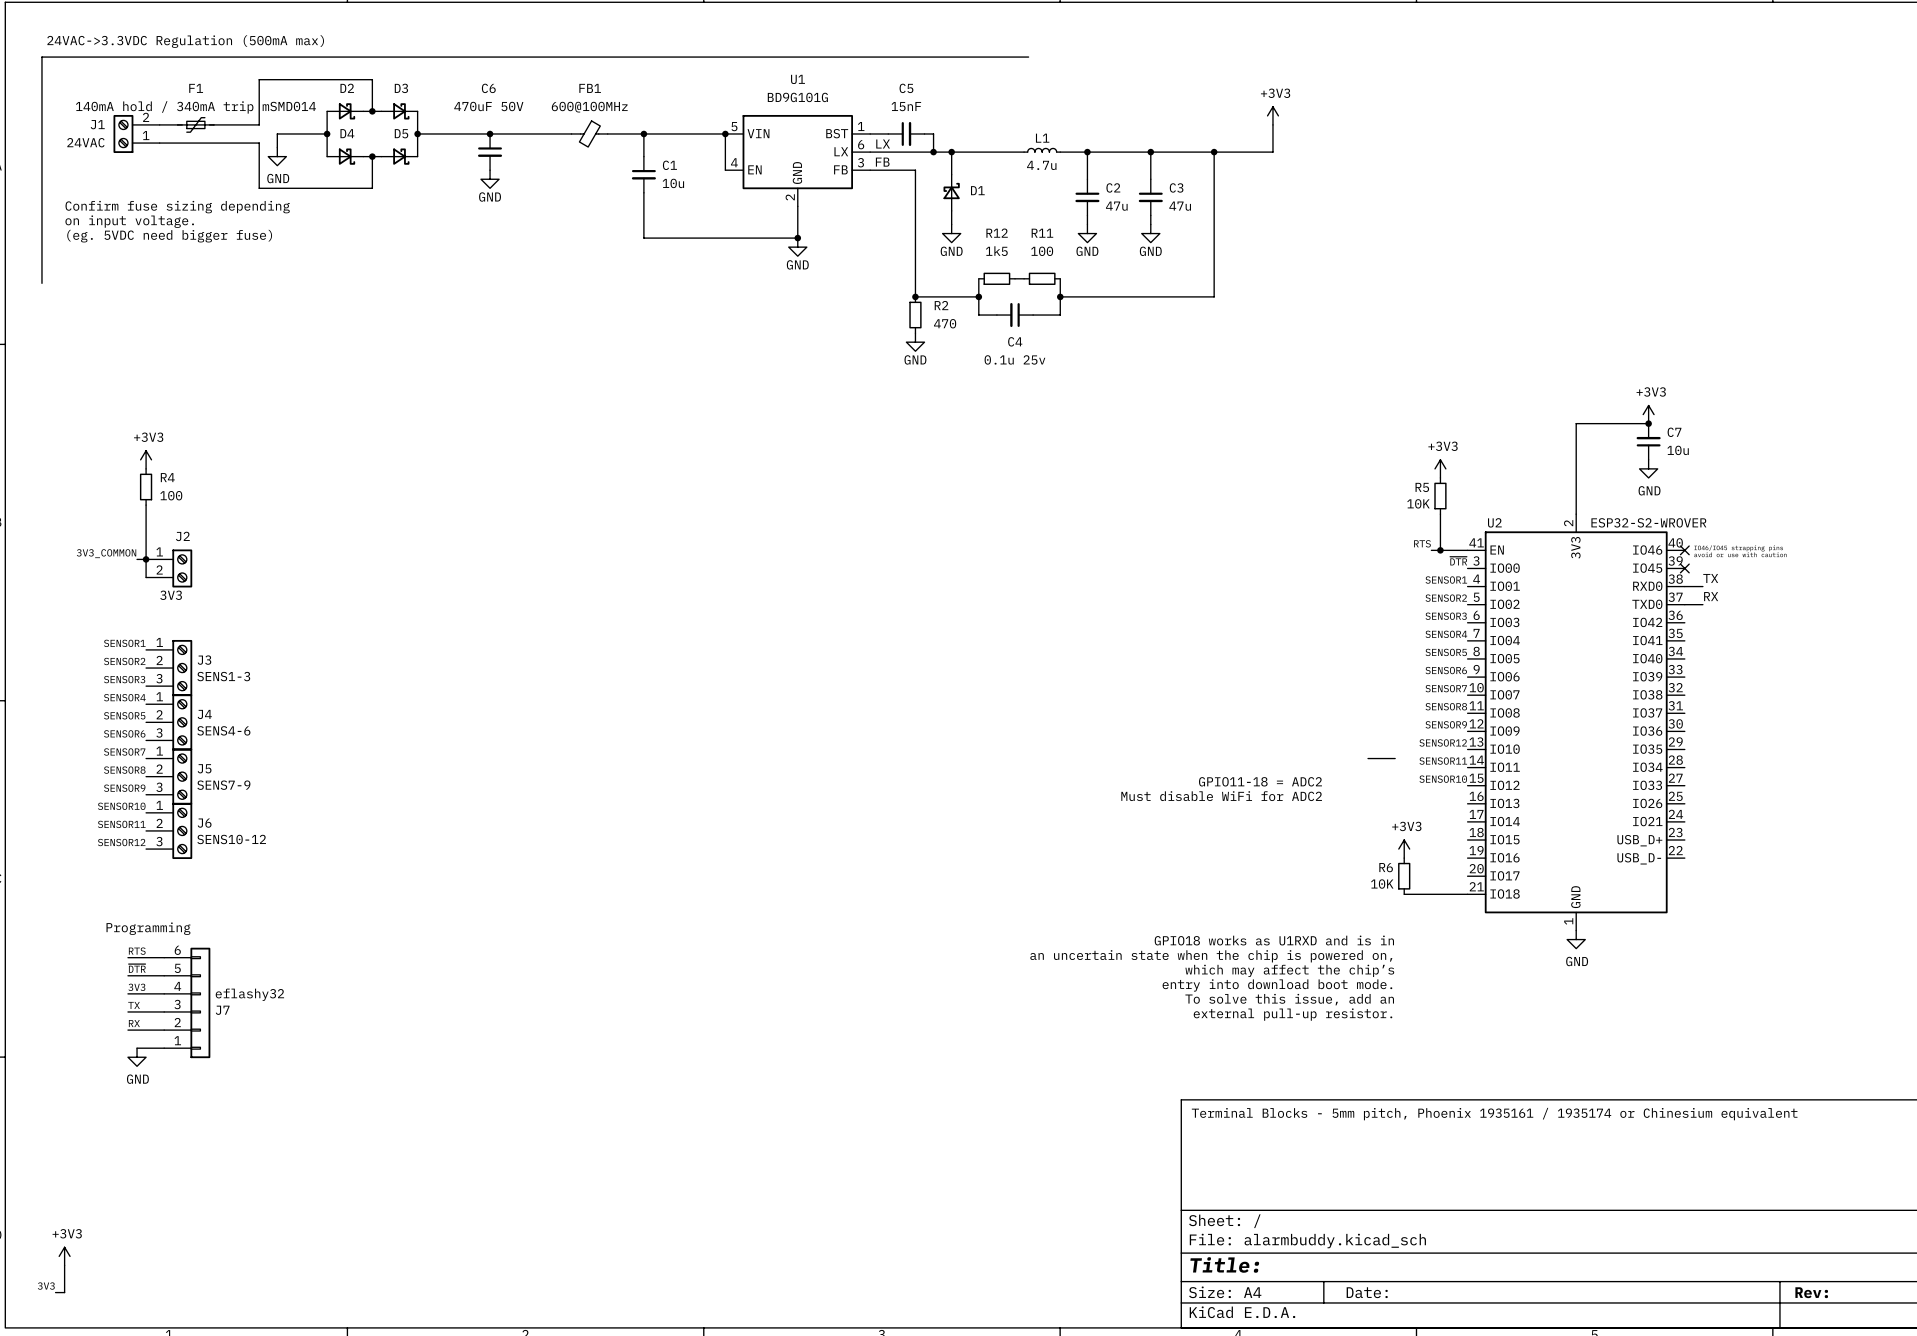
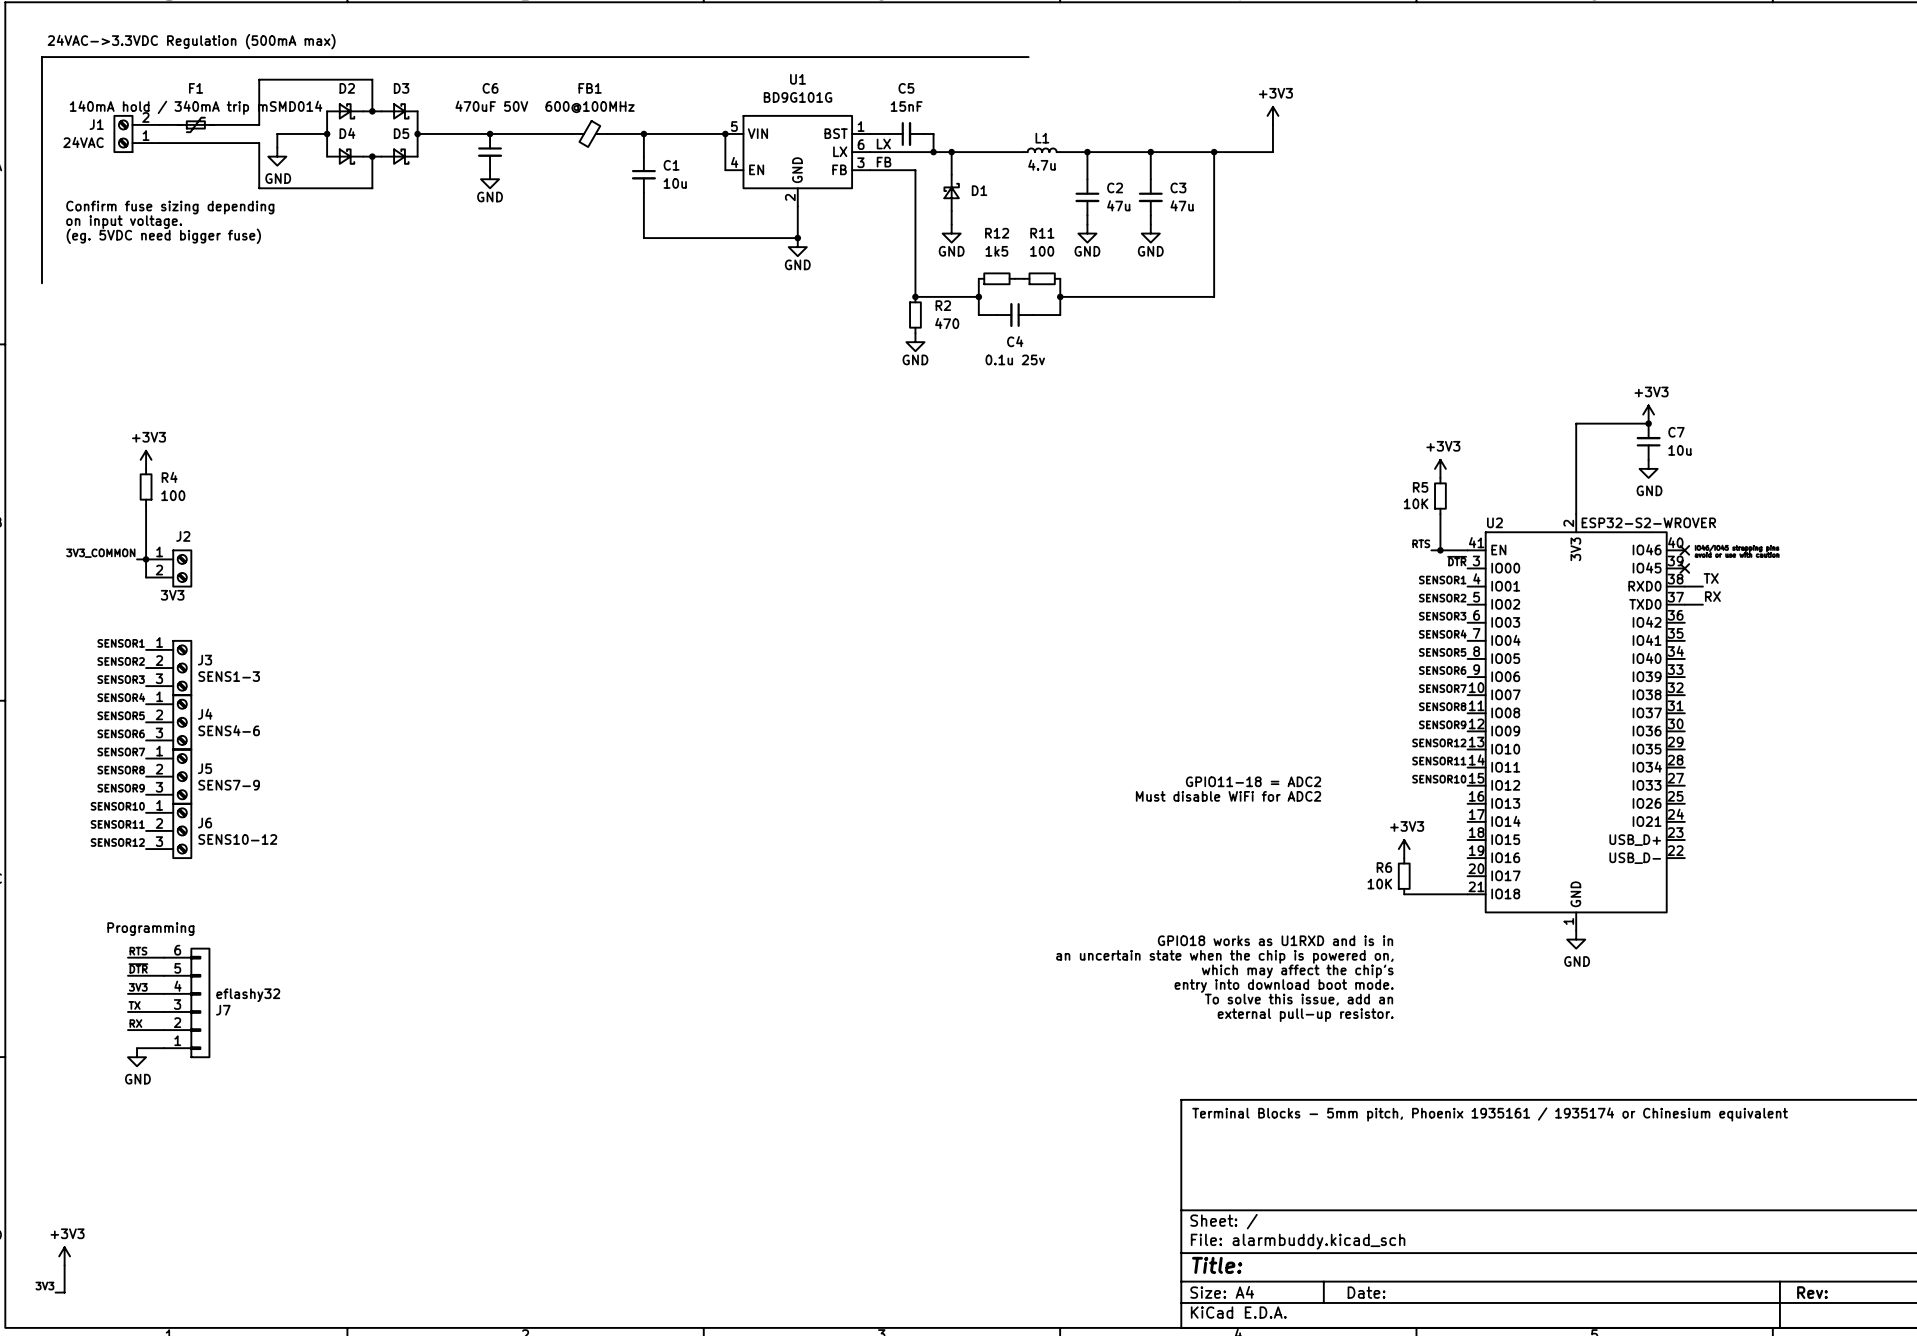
line: (1368, 758) (1395, 758) -> none

